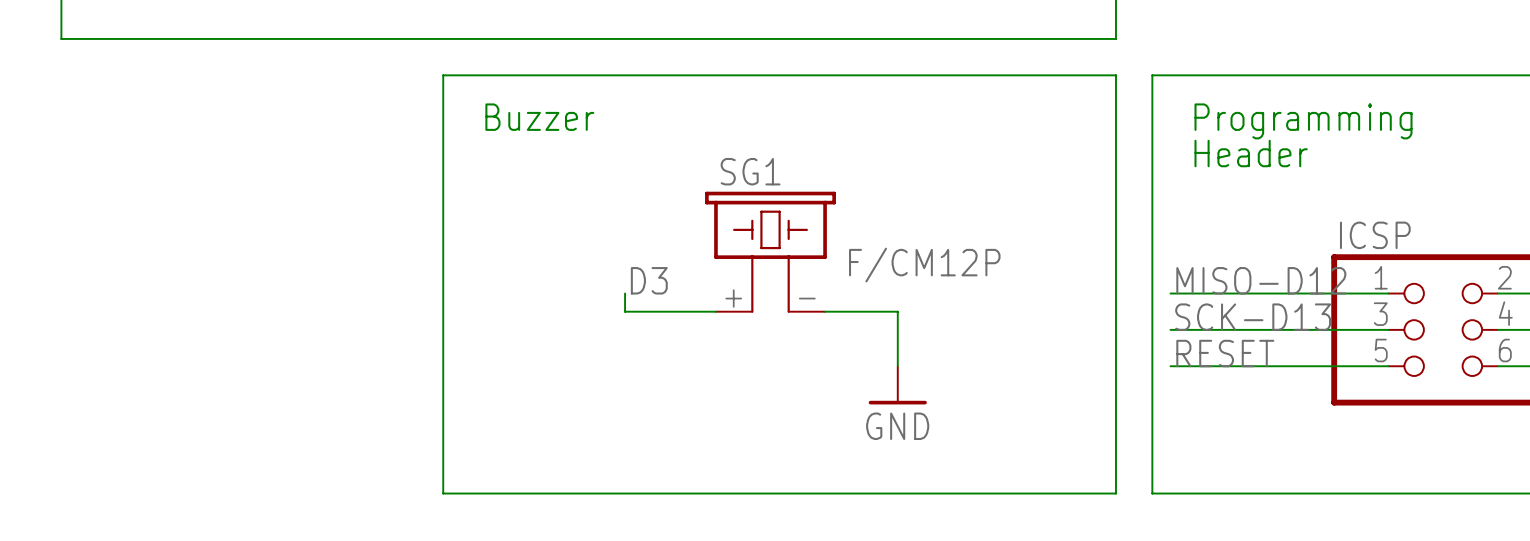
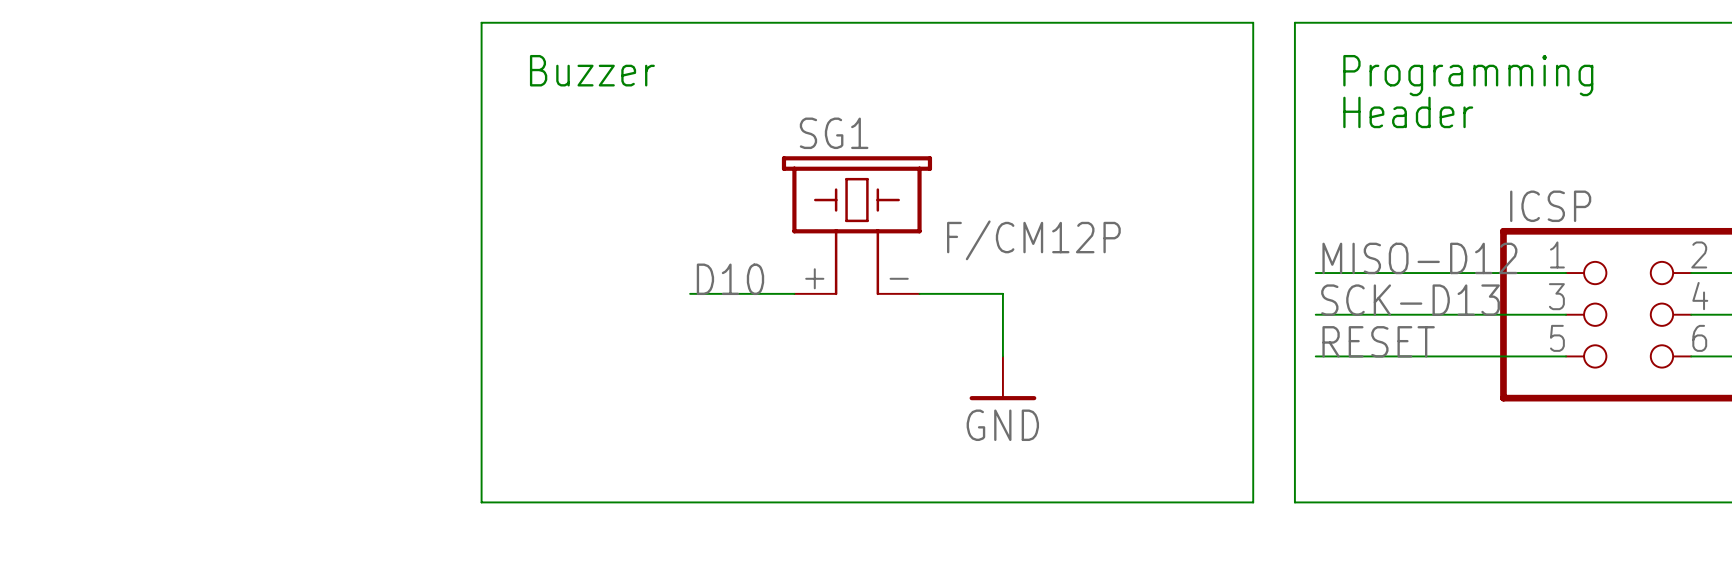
label: D3 (649, 280) -> none
wire: (625, 293) (625, 311) -> none
label: none -> D10 (730, 279)

